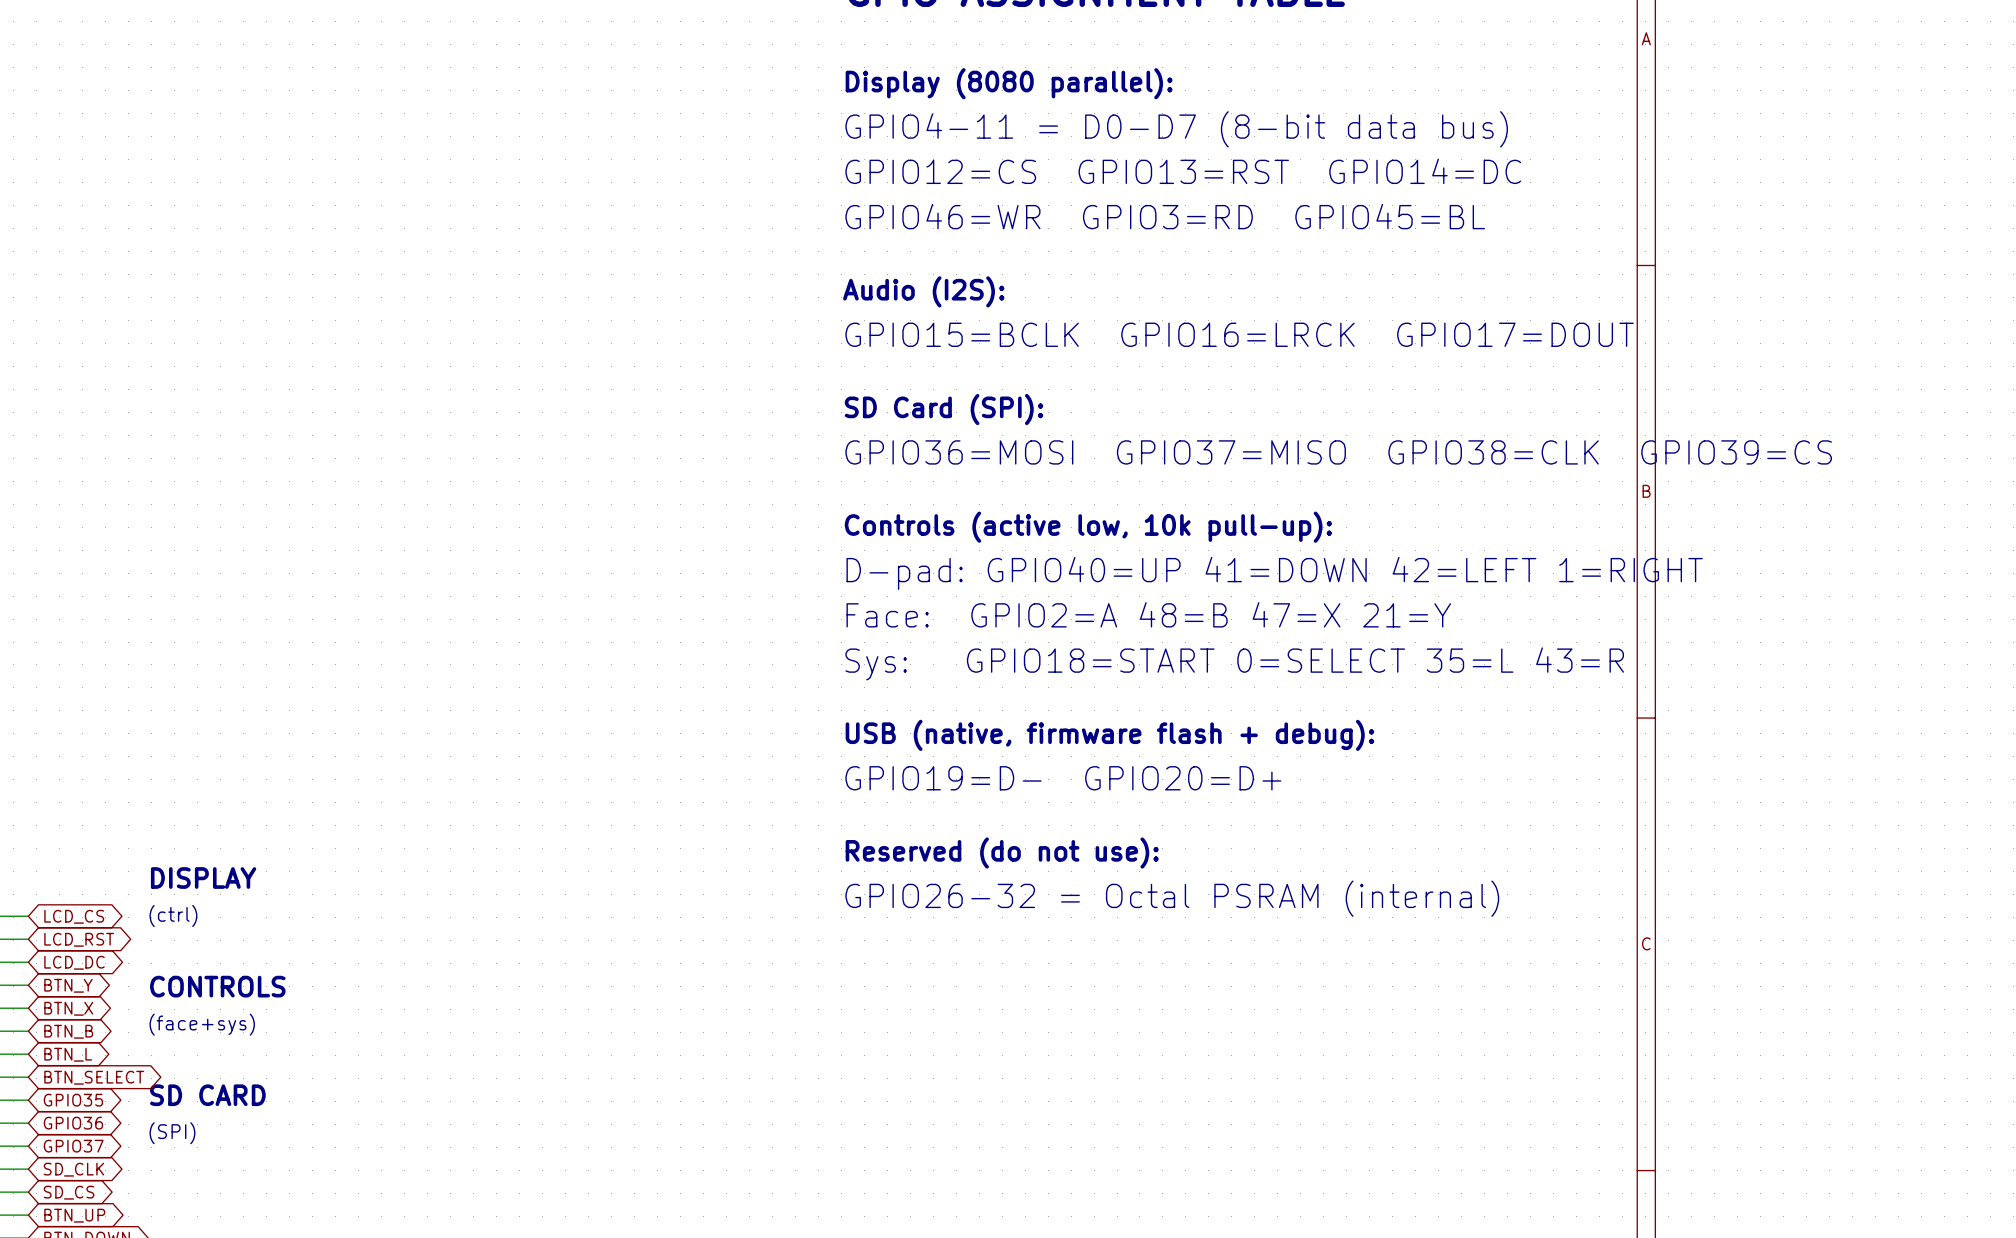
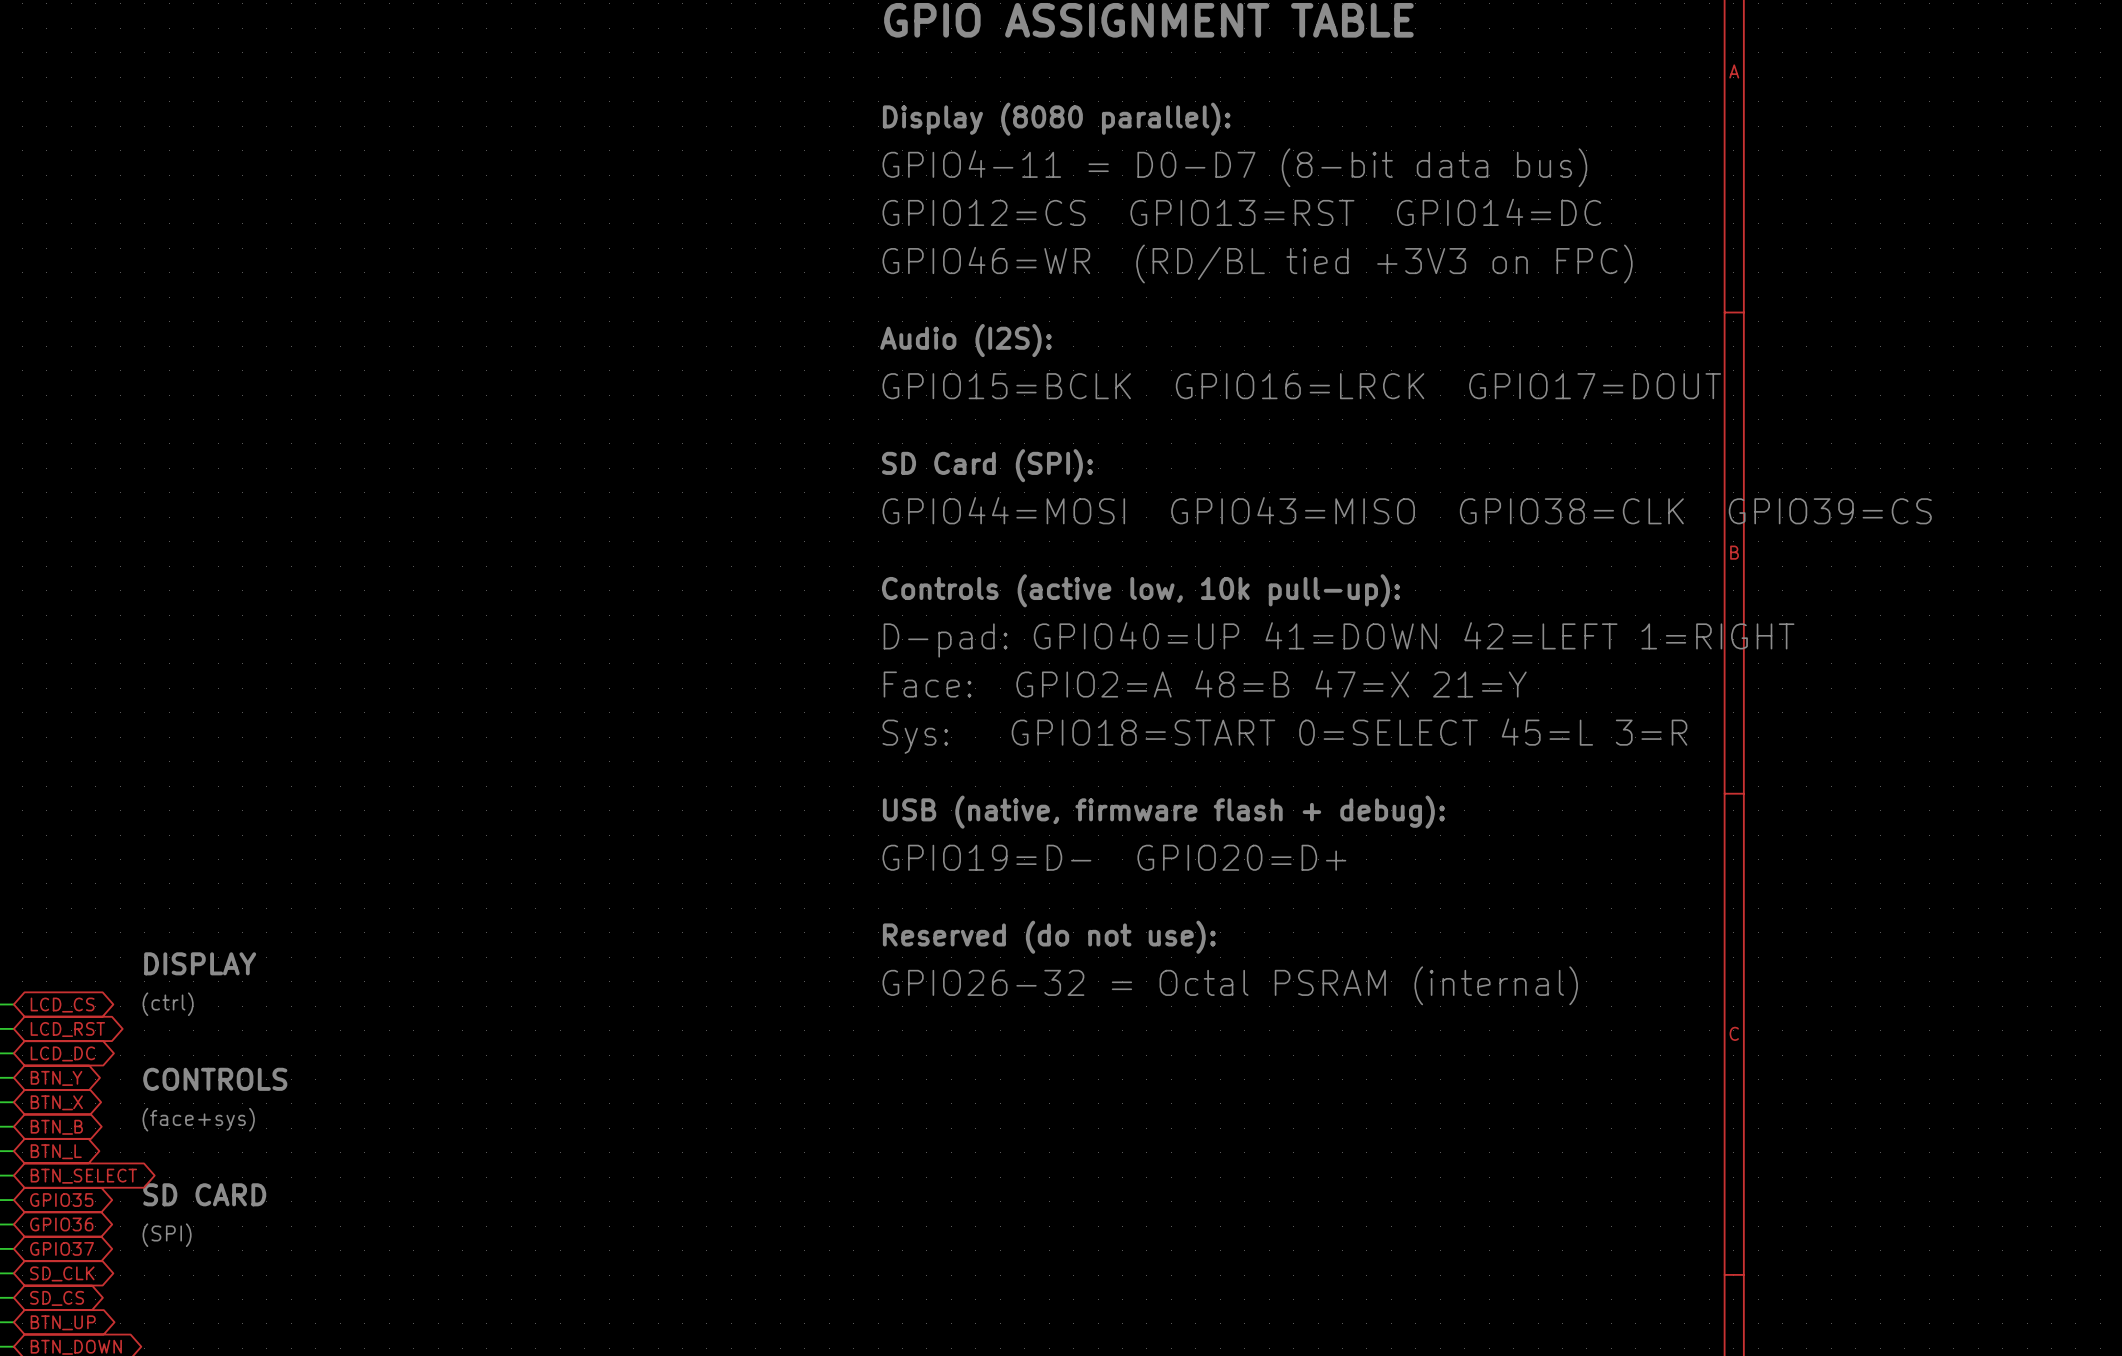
text: GPIO46=WR GPIO3=RD GPIO45=BL (1165, 216) -> GPIO46=WR (RD/BL tied +3V3 on FPC) (1257, 263)
text: GPIO36=MOSI GPIO37=MISO GPIO38=CLK GPIO39=CS (1338, 452) -> GPIO44=MOSI GPIO43=MISO GPIO38=CLK GPIO39=CS (1407, 510)
text: Sys: GPIO18=START 0=SELECT 35=L 43=R (1234, 663) -> Sys: GPIO18=START 0=SELECT 45=L 3=R (1284, 736)

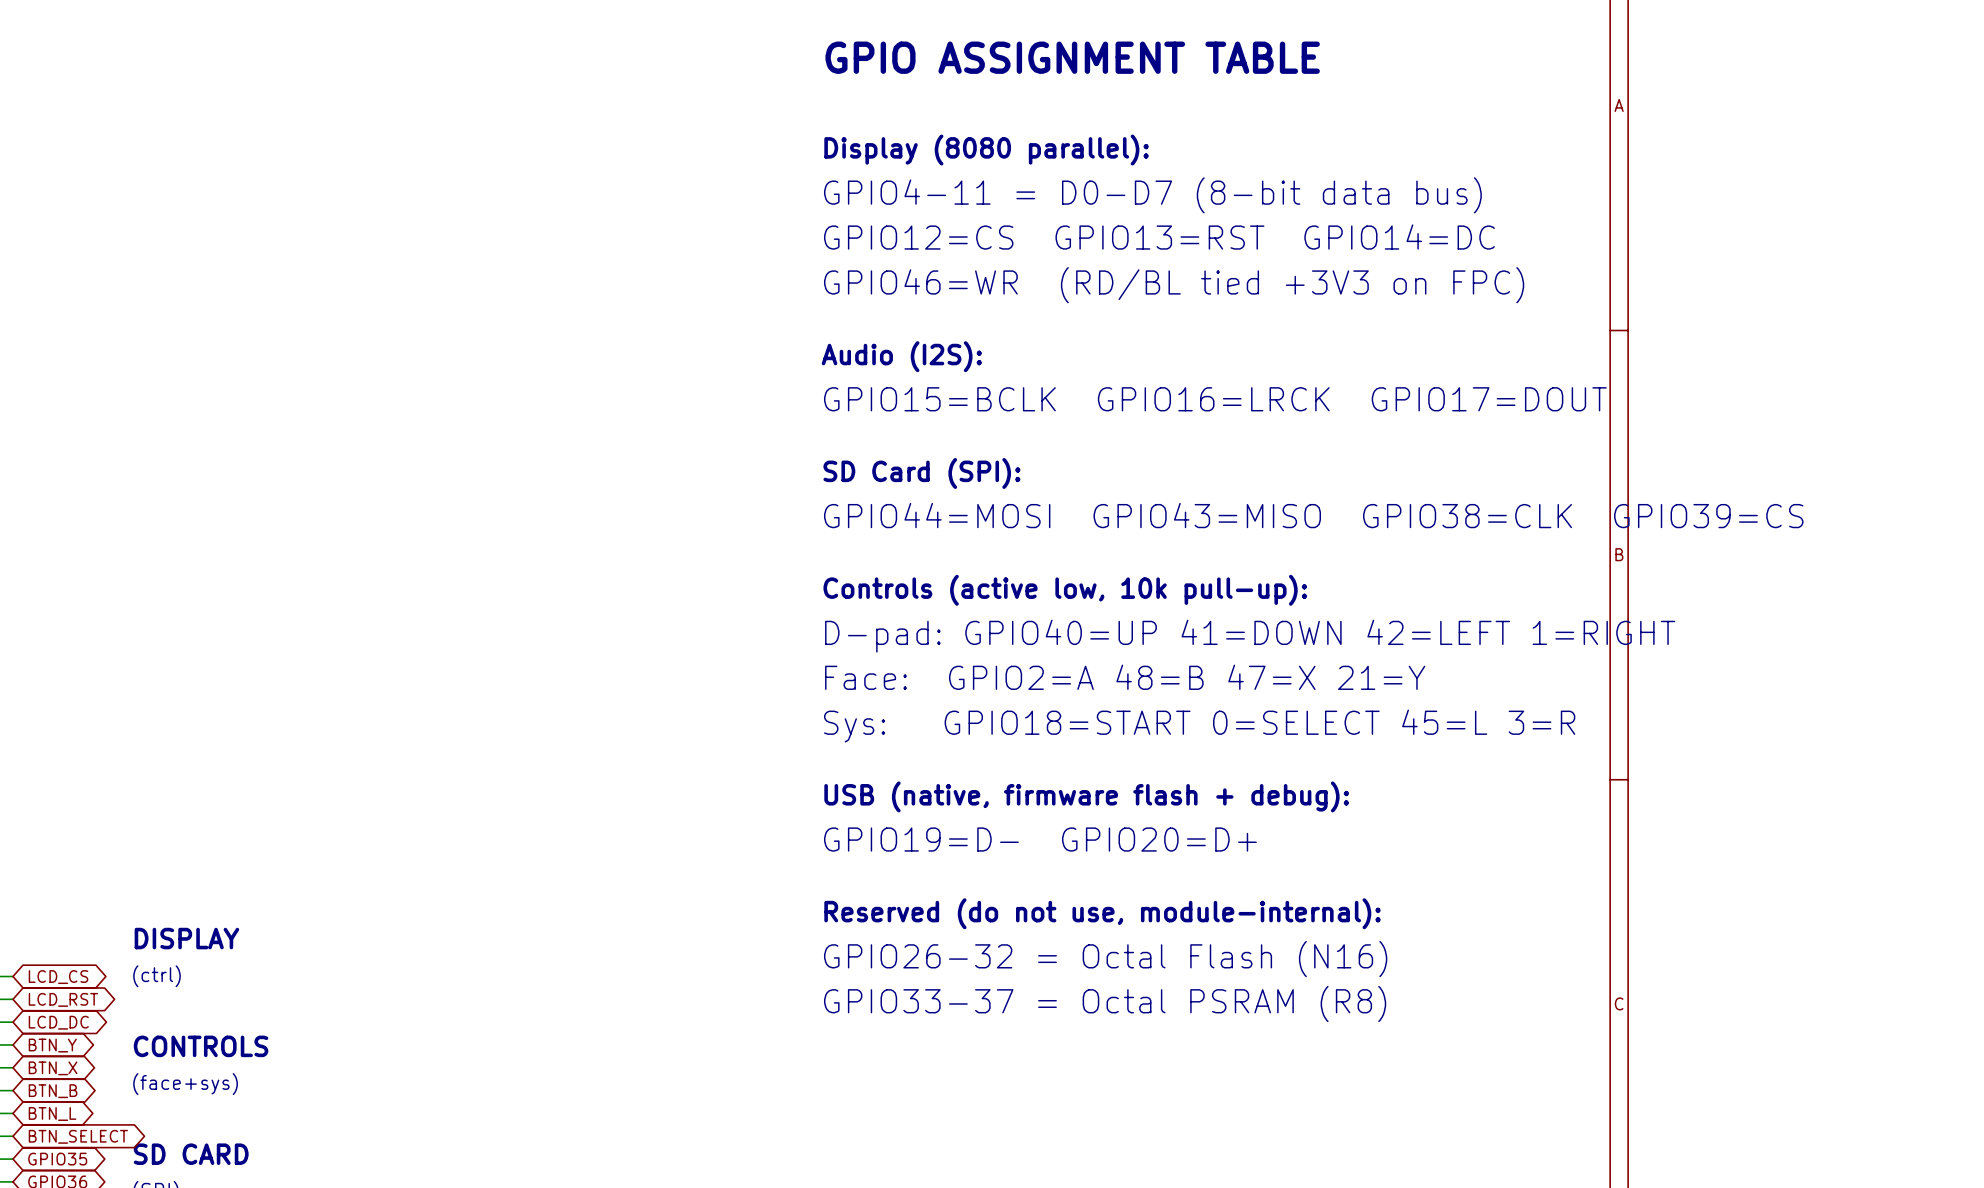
text: Reserved (do not use): (1049, 937) -> Reserved (do not use, module-internal): (1102, 913)
text: GPIO26-32 = Octal PSRAM (internal) (1230, 985) -> GPIO26-32 = Octal Flash (N16) (1105, 959)
text: none -> GPIO33-37 = Octal PSRAM (R8) (1105, 1003)

